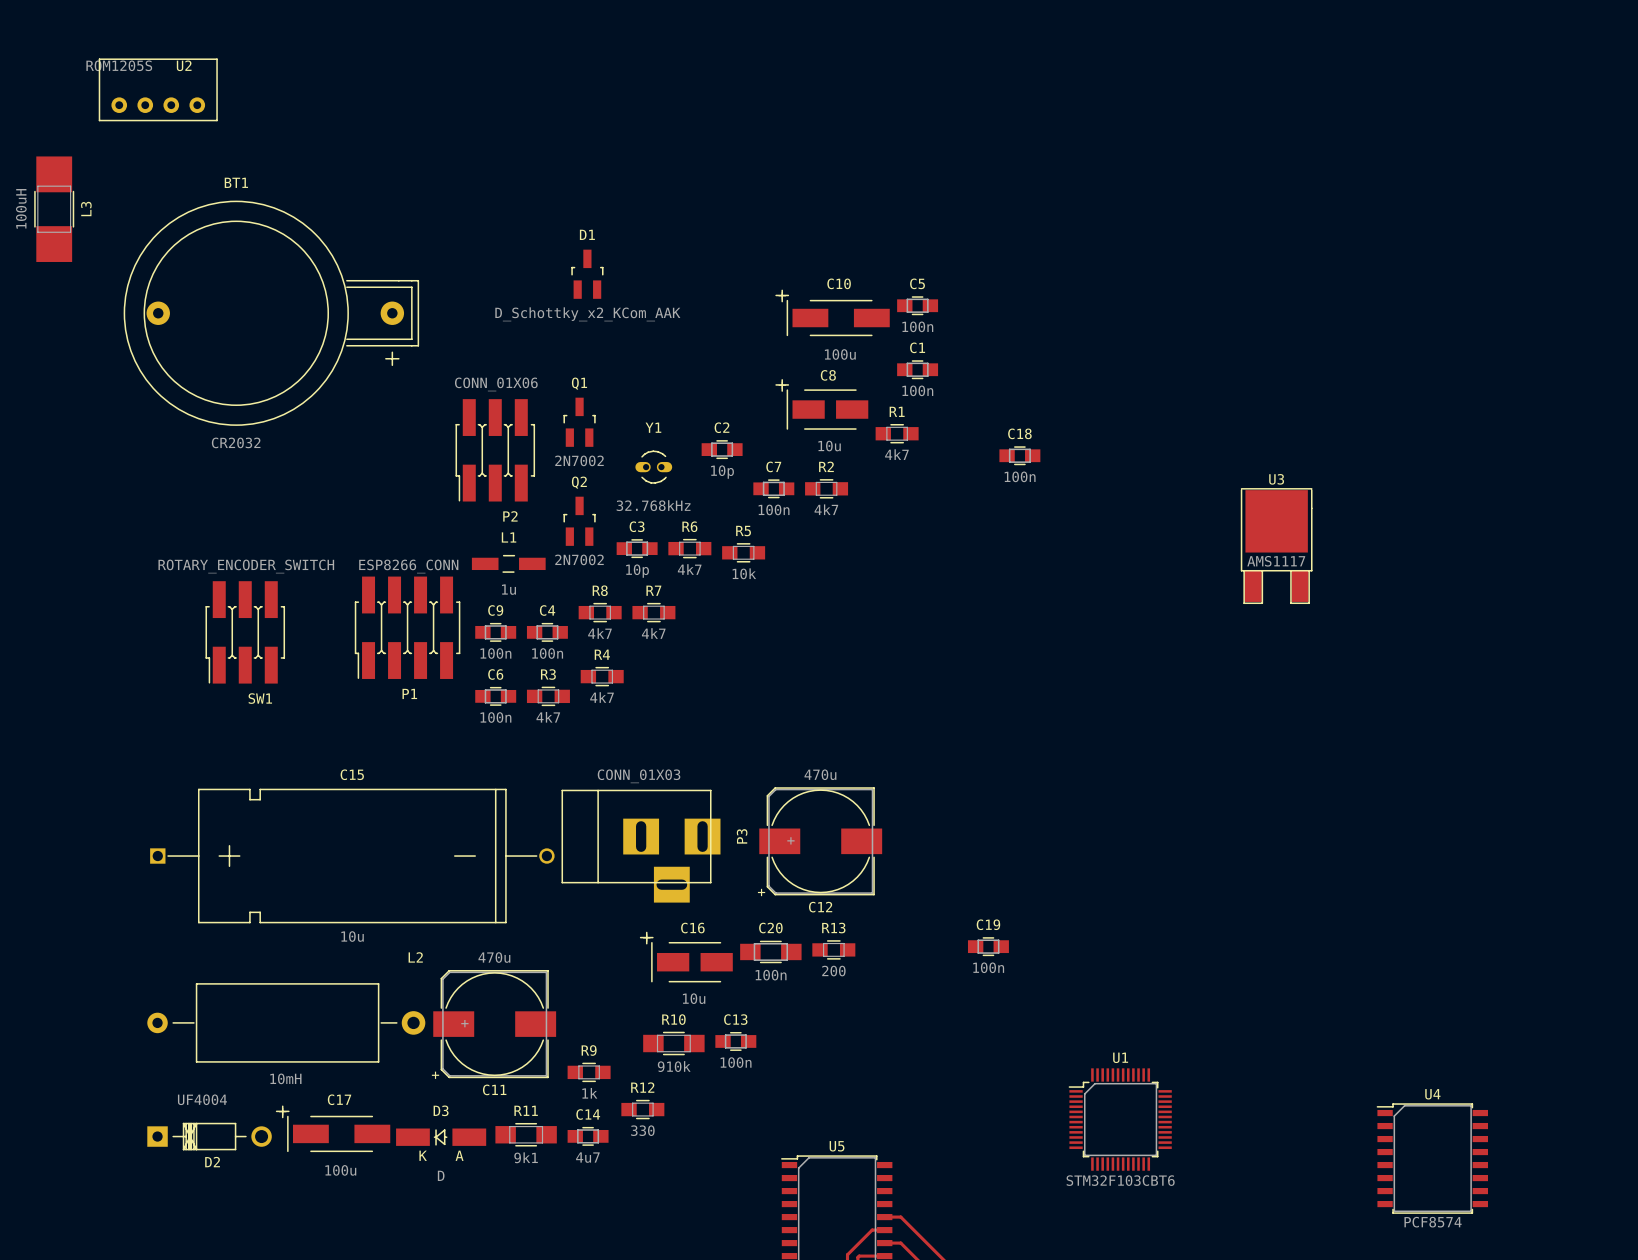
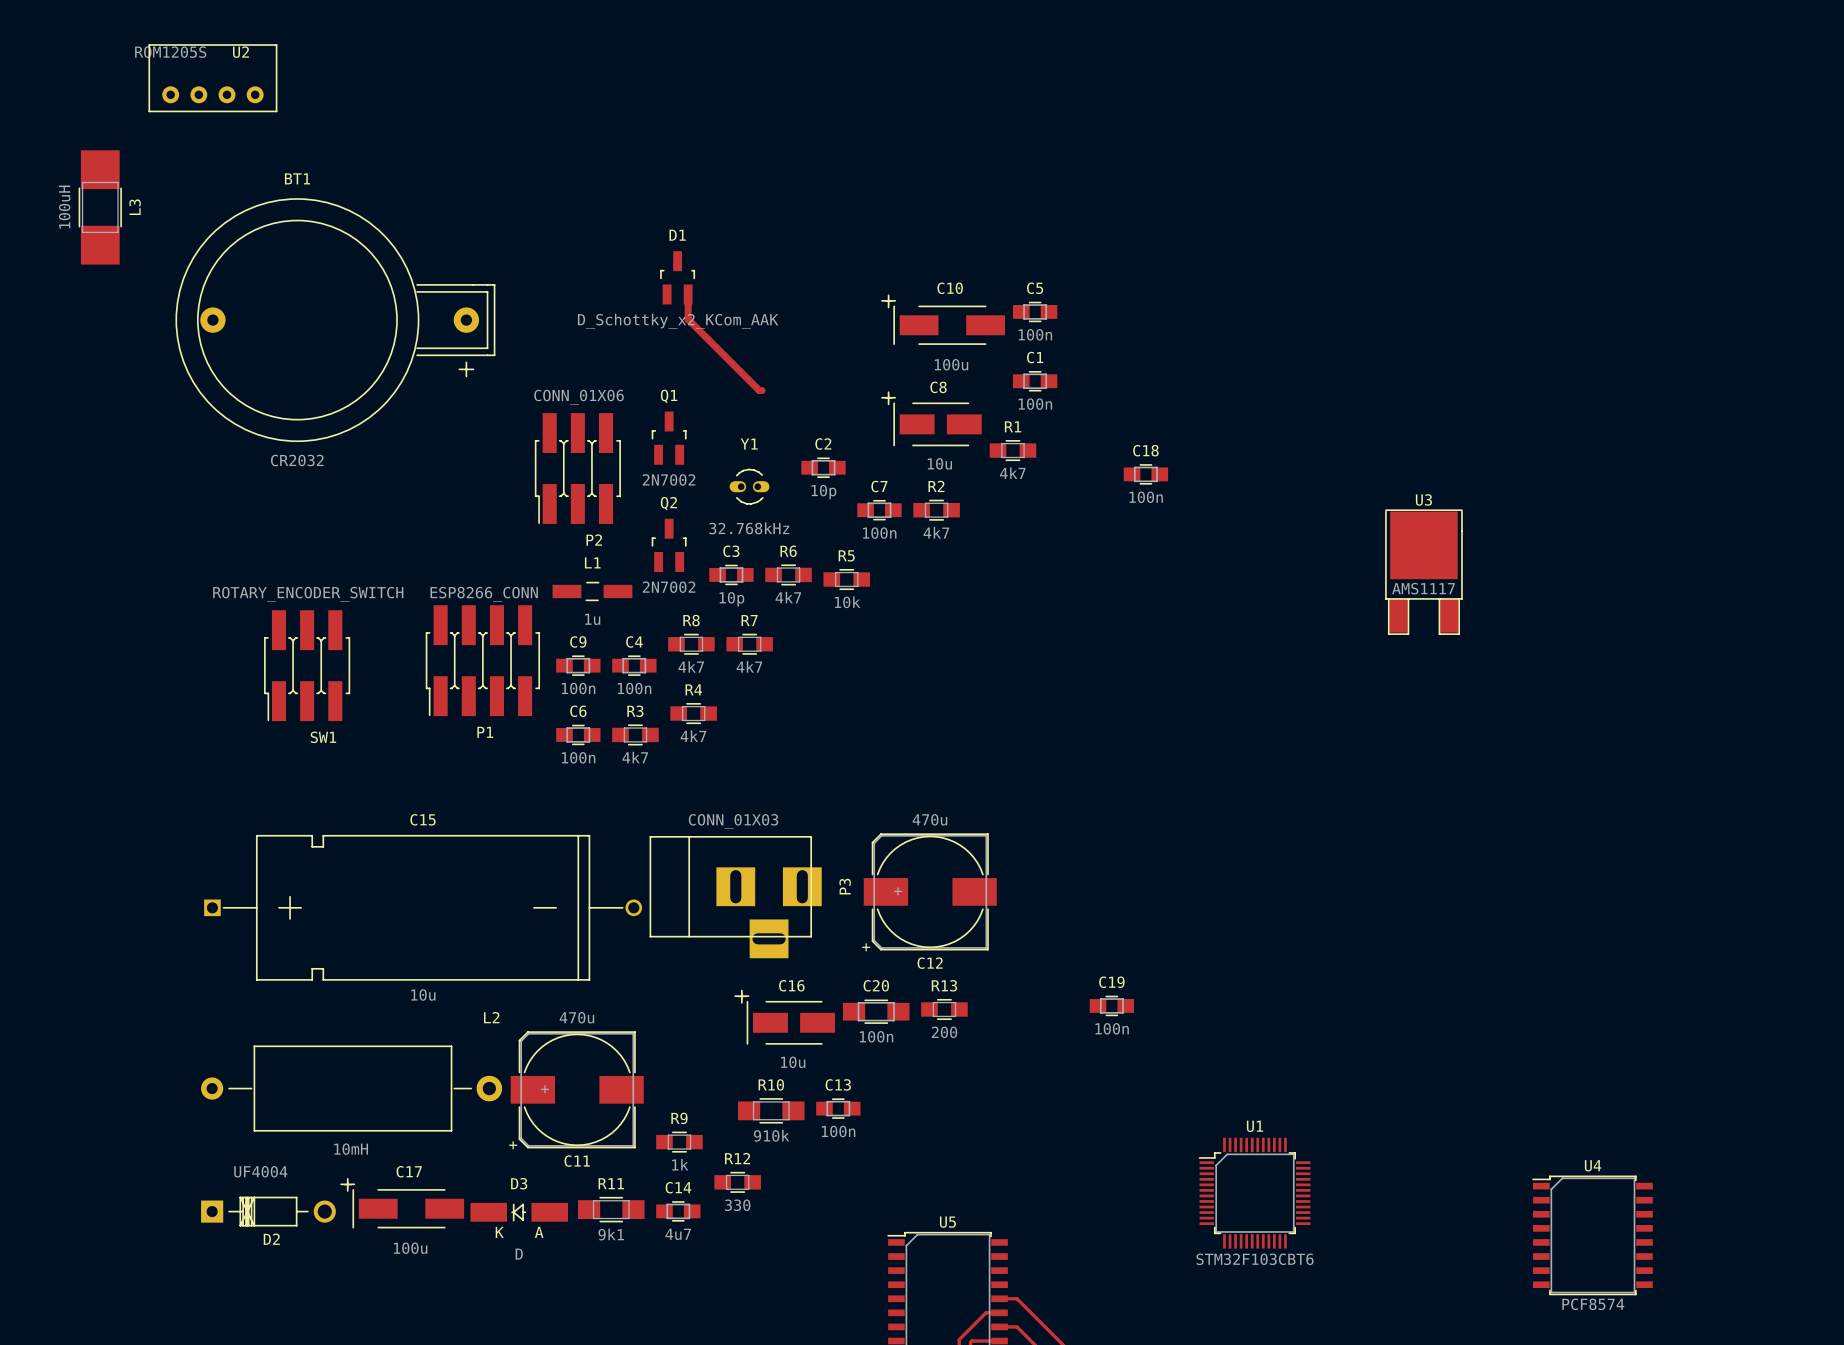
top track: none -> (688, 294) (688, 319) (759, 390) (762, 390)

